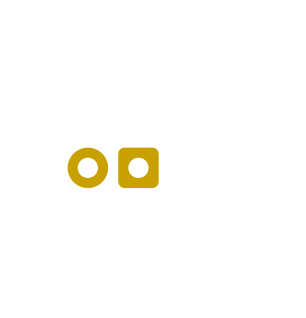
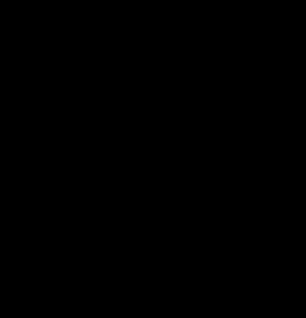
part: (113, 167) -> none

